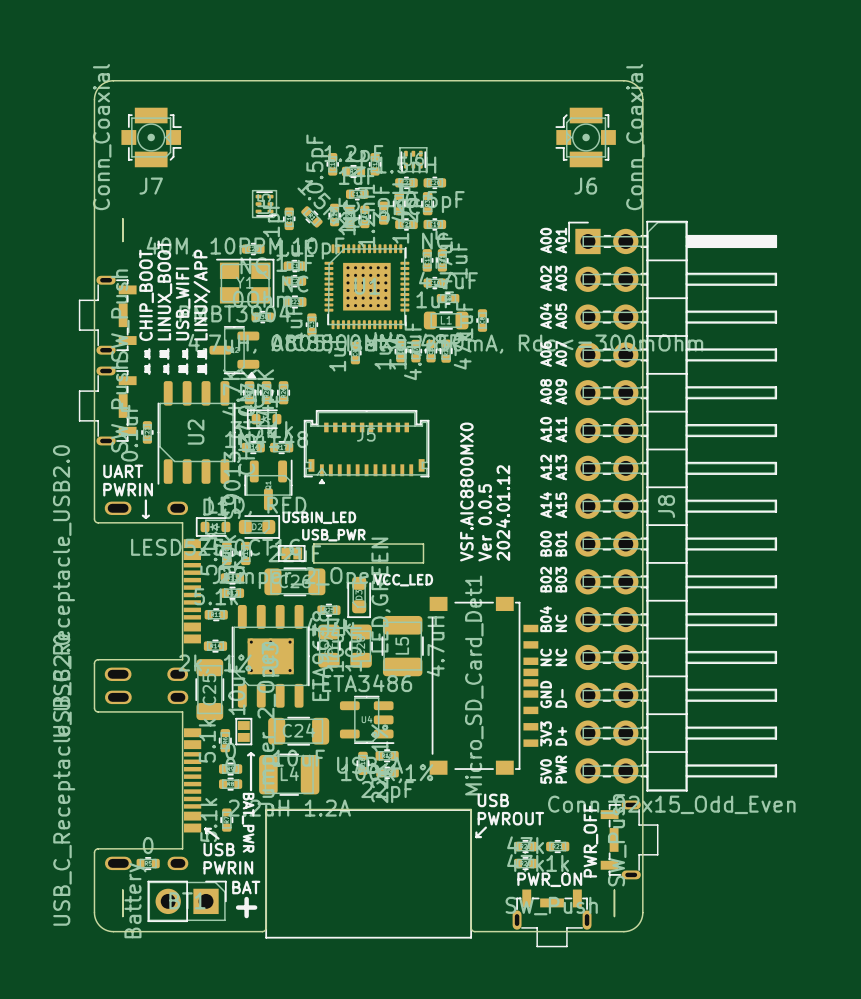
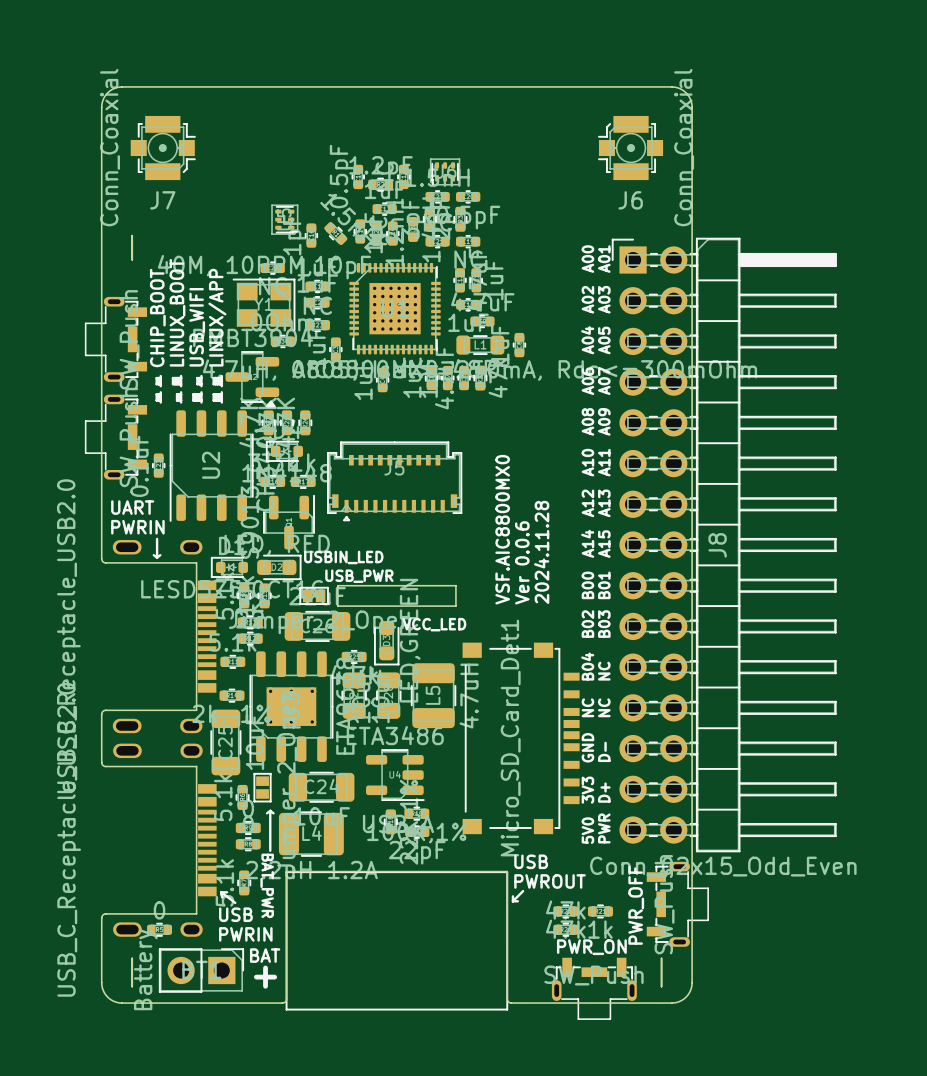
text: 2024.01.12 (503, 513) -> 2024.11.28 (541, 552)
text: Ver 0.0.5 (485, 522) -> Ver 0.0.6 (522, 562)

